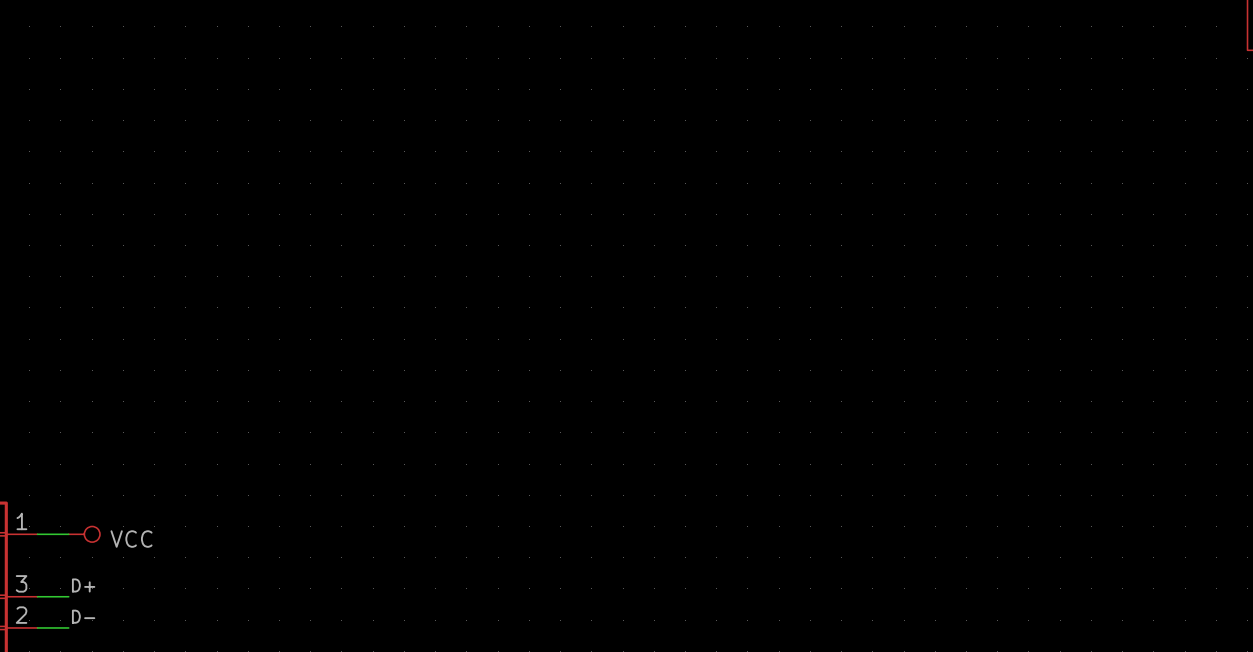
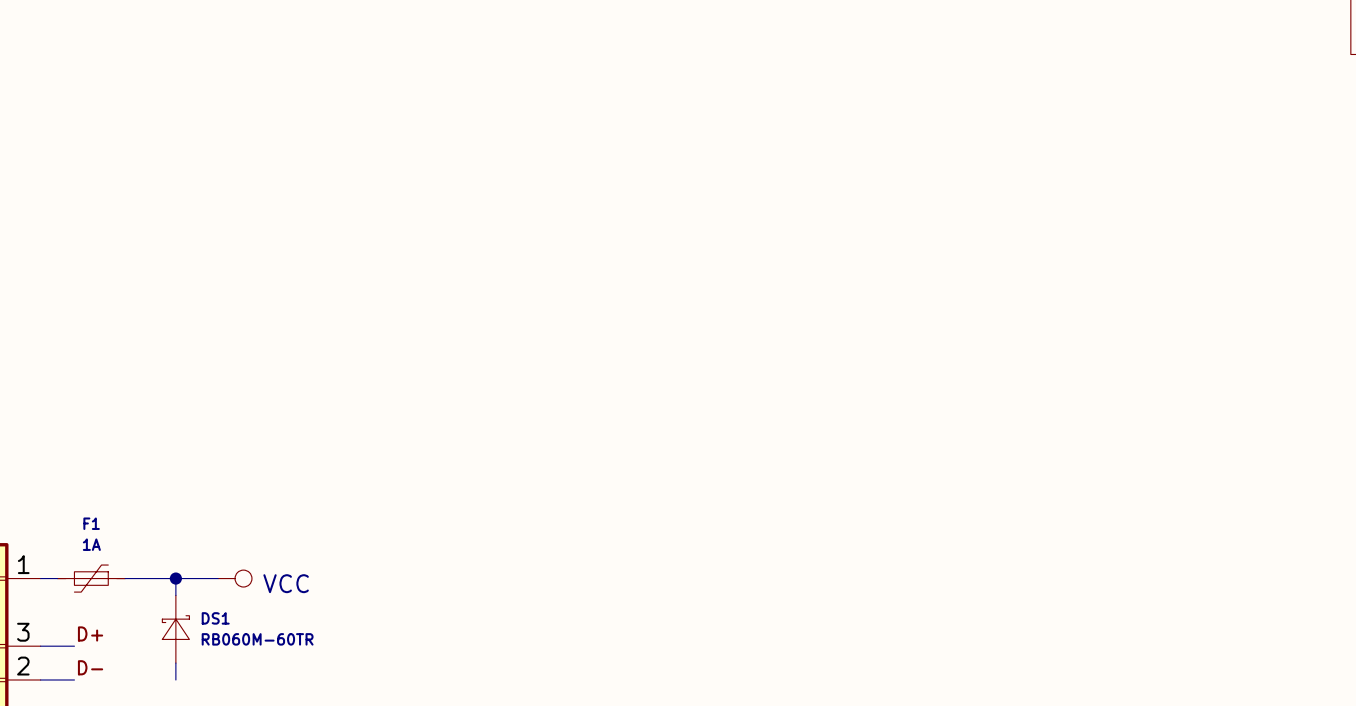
power symbol position: VCC (84, 534) -> VCC (235, 578)
F1: none -> 1A (91, 578)
wire: none -> (125, 578) (218, 578)
wire: none -> (175, 578) (175, 595)
junction: none -> (175, 578)
DS1: none -> RB060M-60TR (175, 629)
wire: none -> (175, 663) (175, 679)

